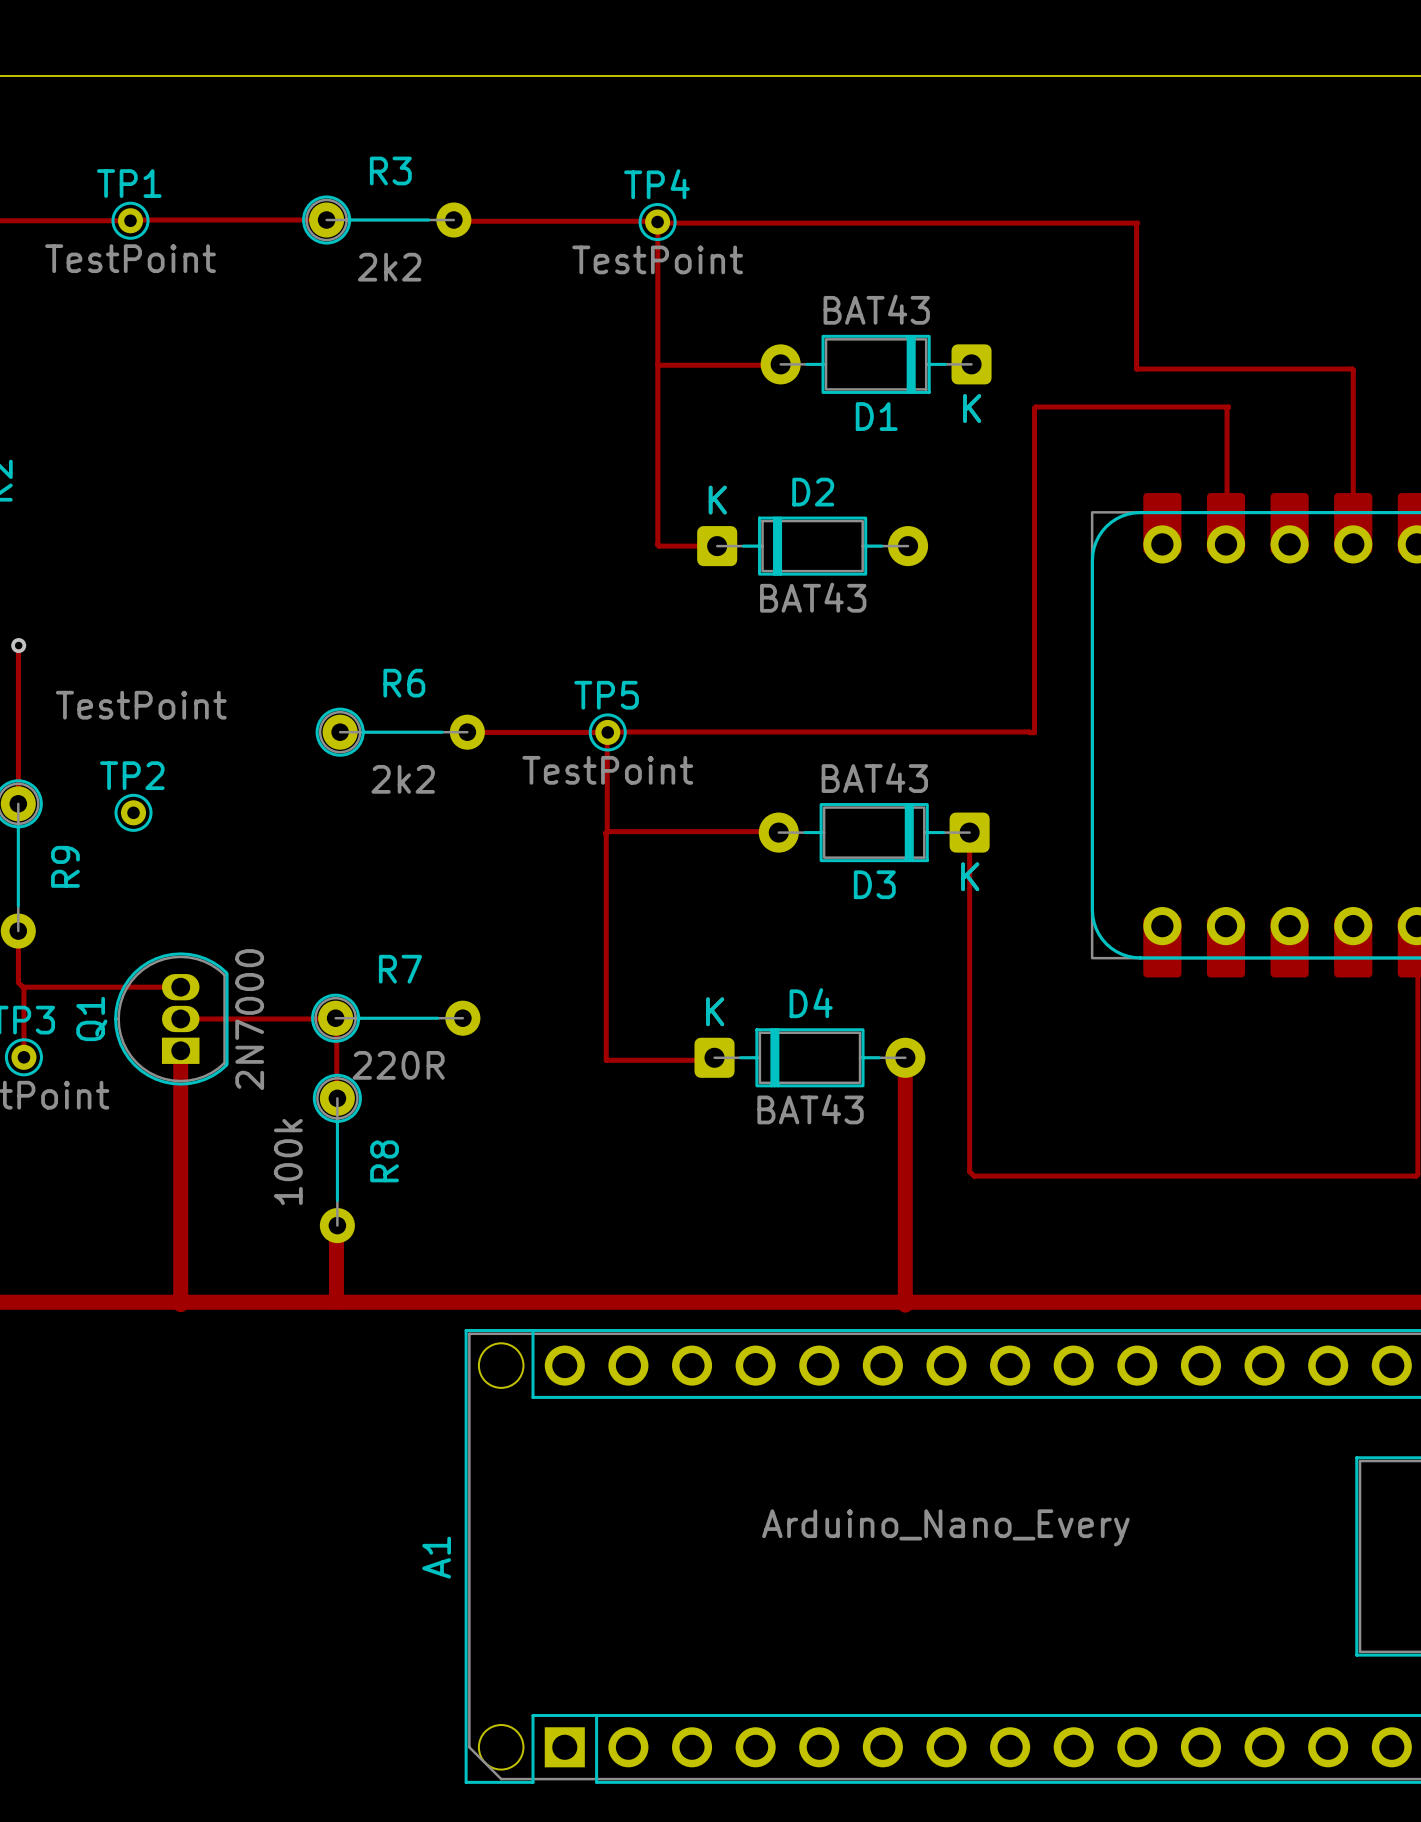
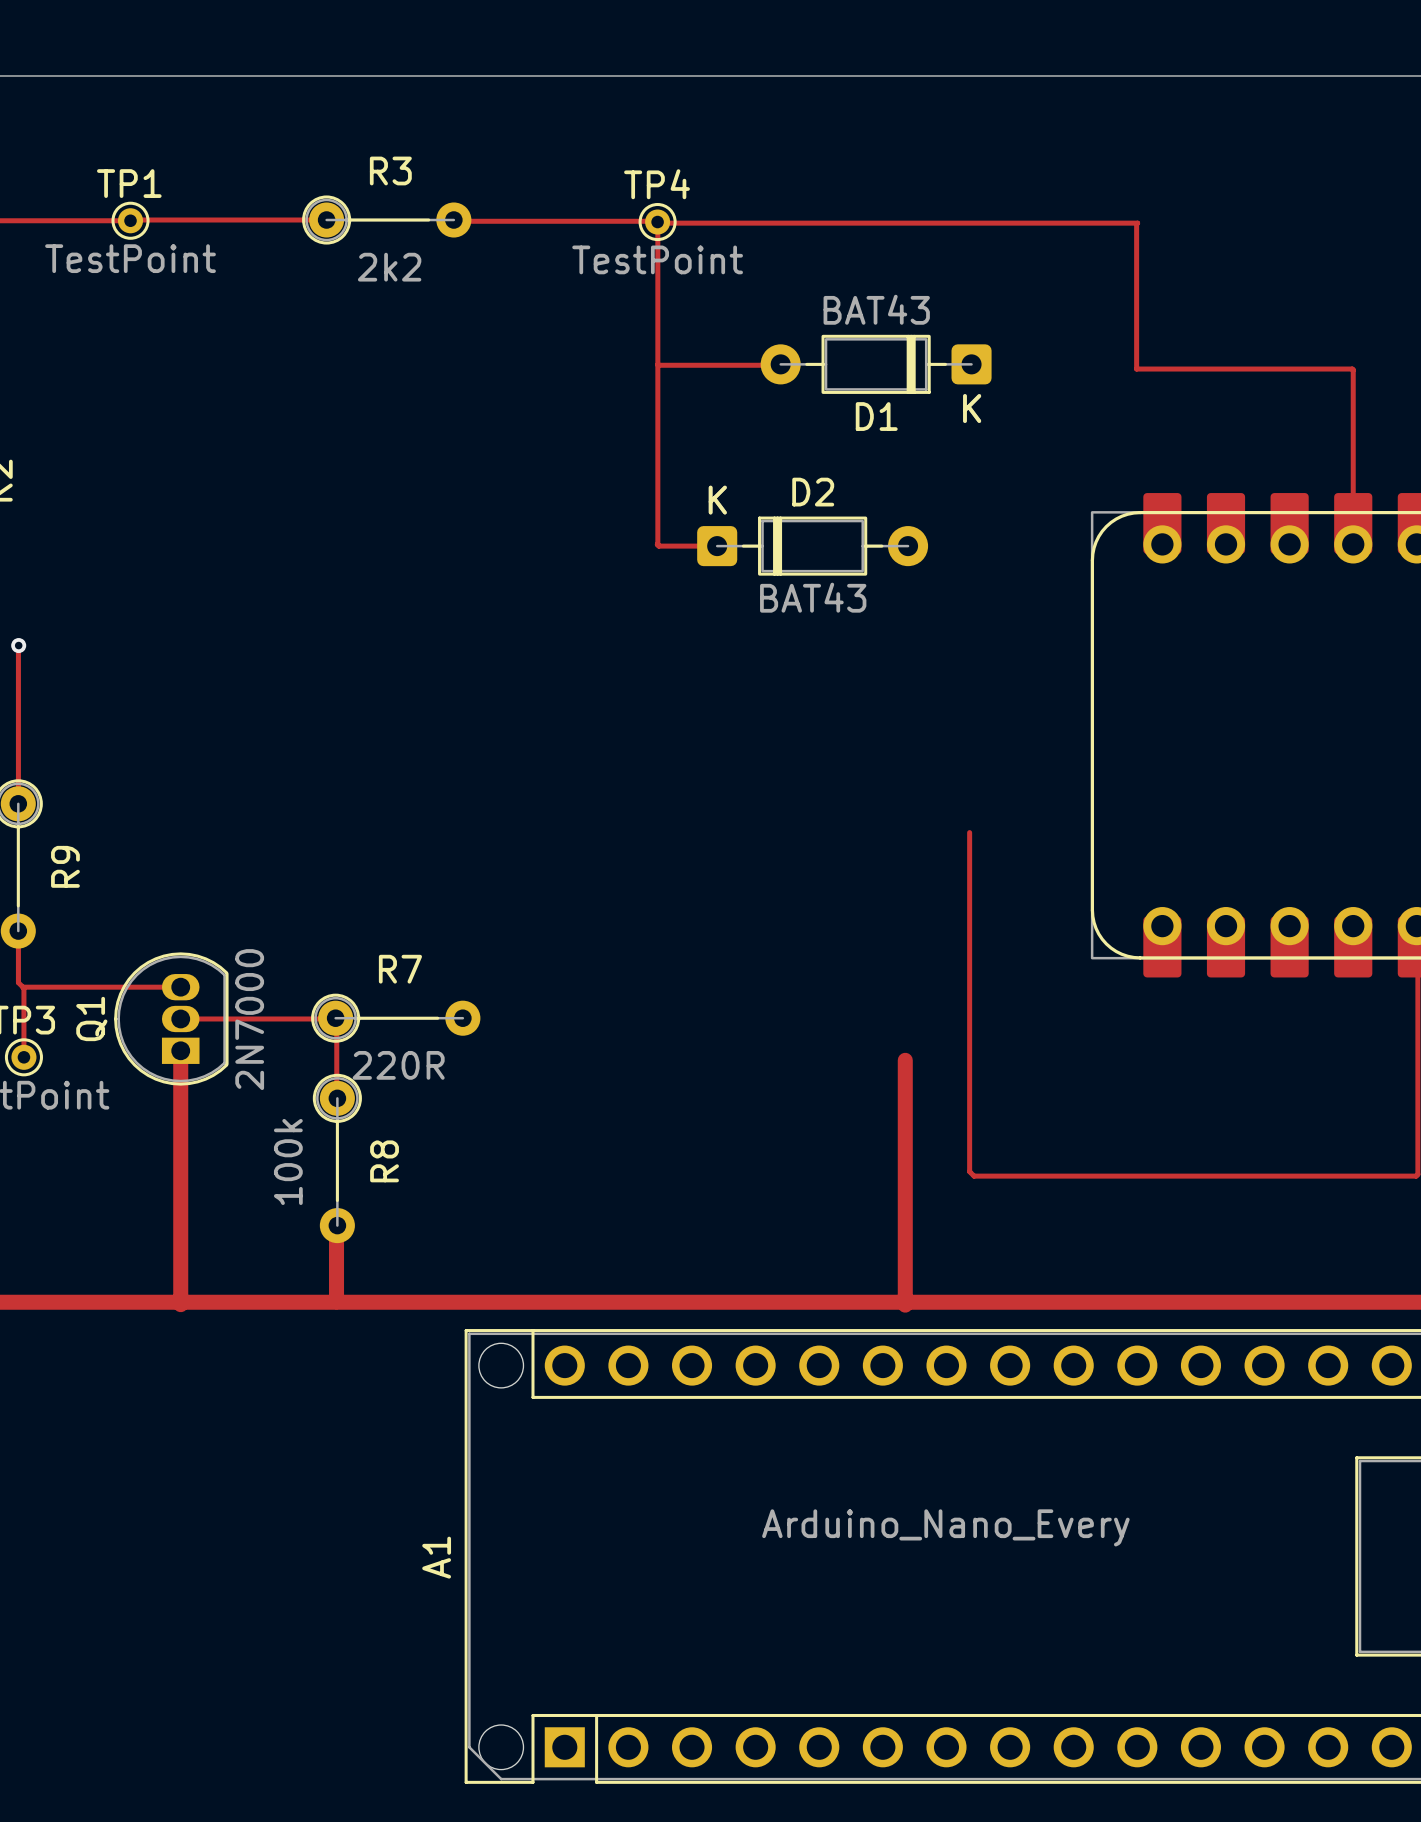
track: (1227, 520) (1228, 406) (1035, 406) (1034, 732) (609, 731) -> none
R6: 2k2 (400, 732) -> none
track: (468, 732) (607, 732) (607, 831) -> none
TP5: TestPoint (607, 732) -> none
TP2: TestPoint (133, 812) -> none
track: (607, 831) (605, 833) (606, 1060) (714, 1060) -> none
track: (607, 831) (788, 831) -> none
D3: BAT43 (874, 832) -> none
D4: BAT43 (809, 1057) -> none

